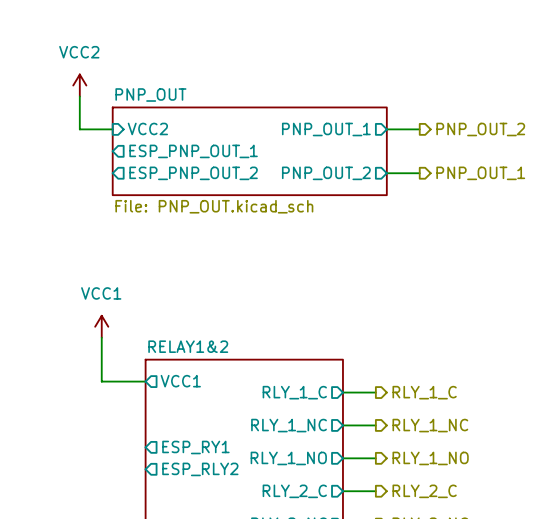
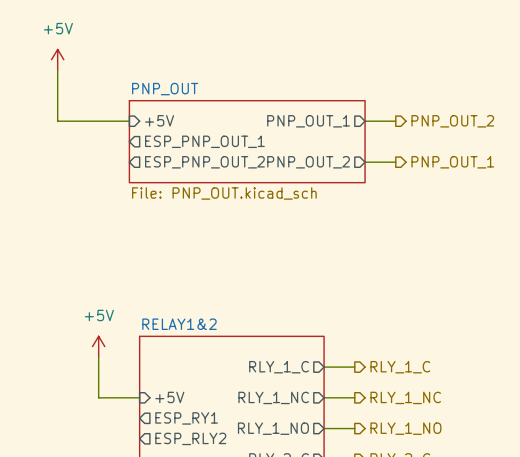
power symbol: none -> +5V (57, 59)
power symbol: VCC2 (79, 85) -> none
wire: (79, 96) (79, 129) -> (57, 69) (57, 121) (78, 121)
sheet pin: VCC2 (147, 128) -> none
sheet pin: none -> +5V (159, 120)
wire: none -> (108, 121) (129, 121)
sheet pin position: ESP_PNP_OUT_1 (193, 151) -> ESP_PNP_OUT_1 (204, 141)
sheet PNP_OUT: File: PNP_OUT.kicad_sch (249, 151) -> none
sheet PNP_OUT: none -> File: PNP_OUT.kicad_sch (247, 141)
sheet pin position: ESP_PNP_OUT_2 (193, 173) -> ESP_PNP_OUT_2 (204, 162)
power symbol: VCC1 (101, 326) -> none
wire: (101, 337) (101, 381) (145, 381) -> (98, 356) (98, 397) (139, 397)
power symbol: none -> +5V (98, 346)
sheet pin: VCC1 (180, 381) -> none
sheet pin: none -> +5V (169, 397)

